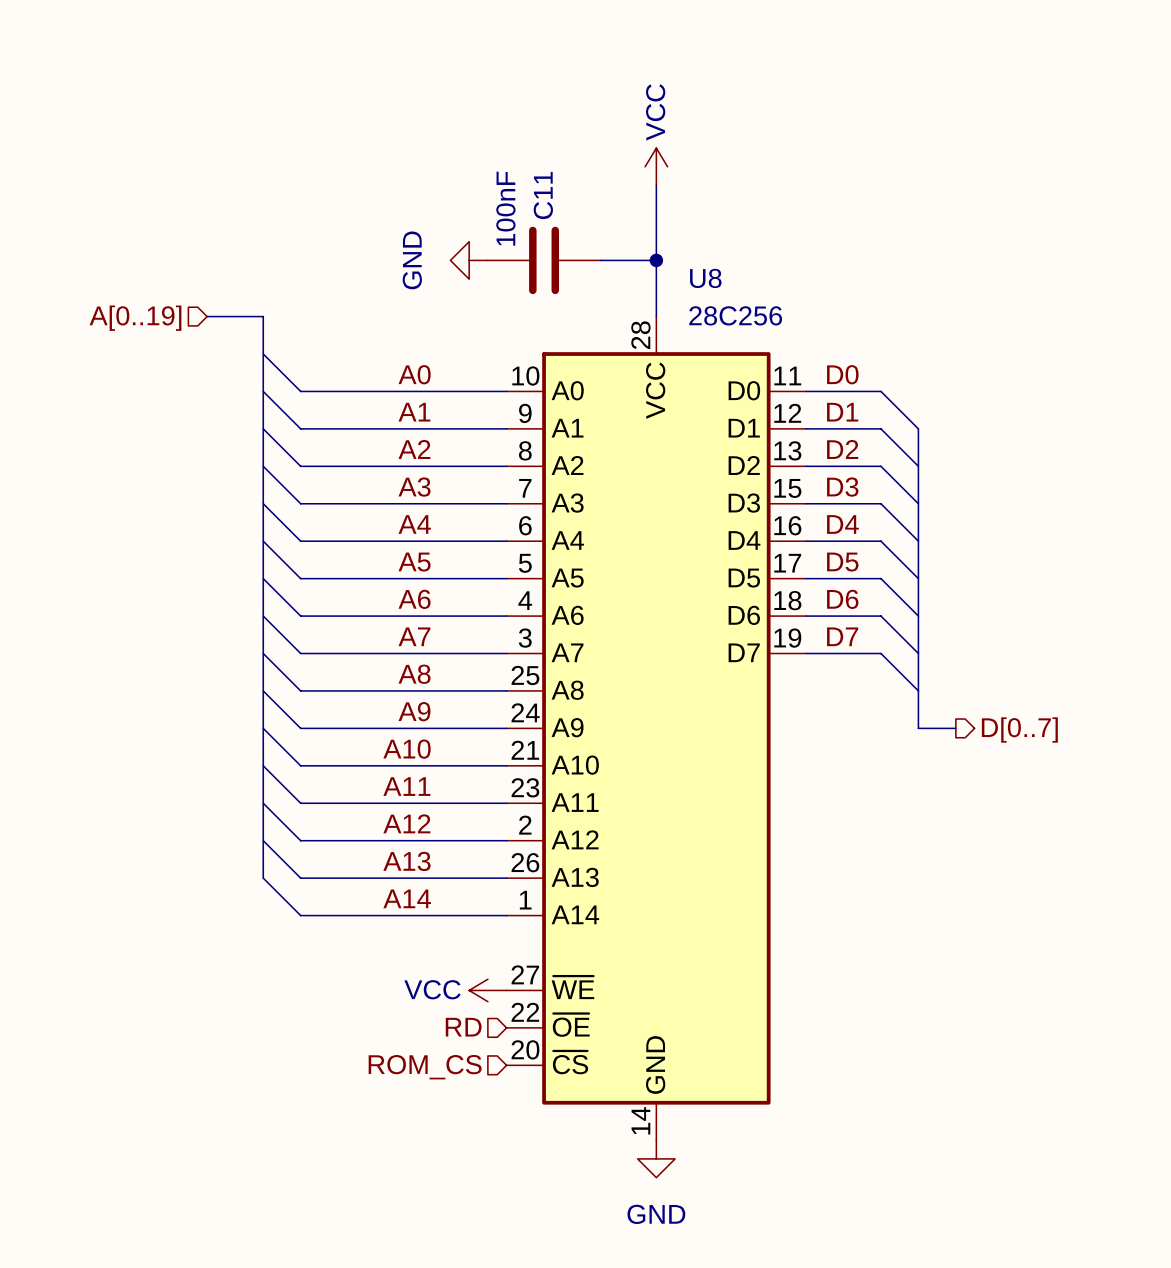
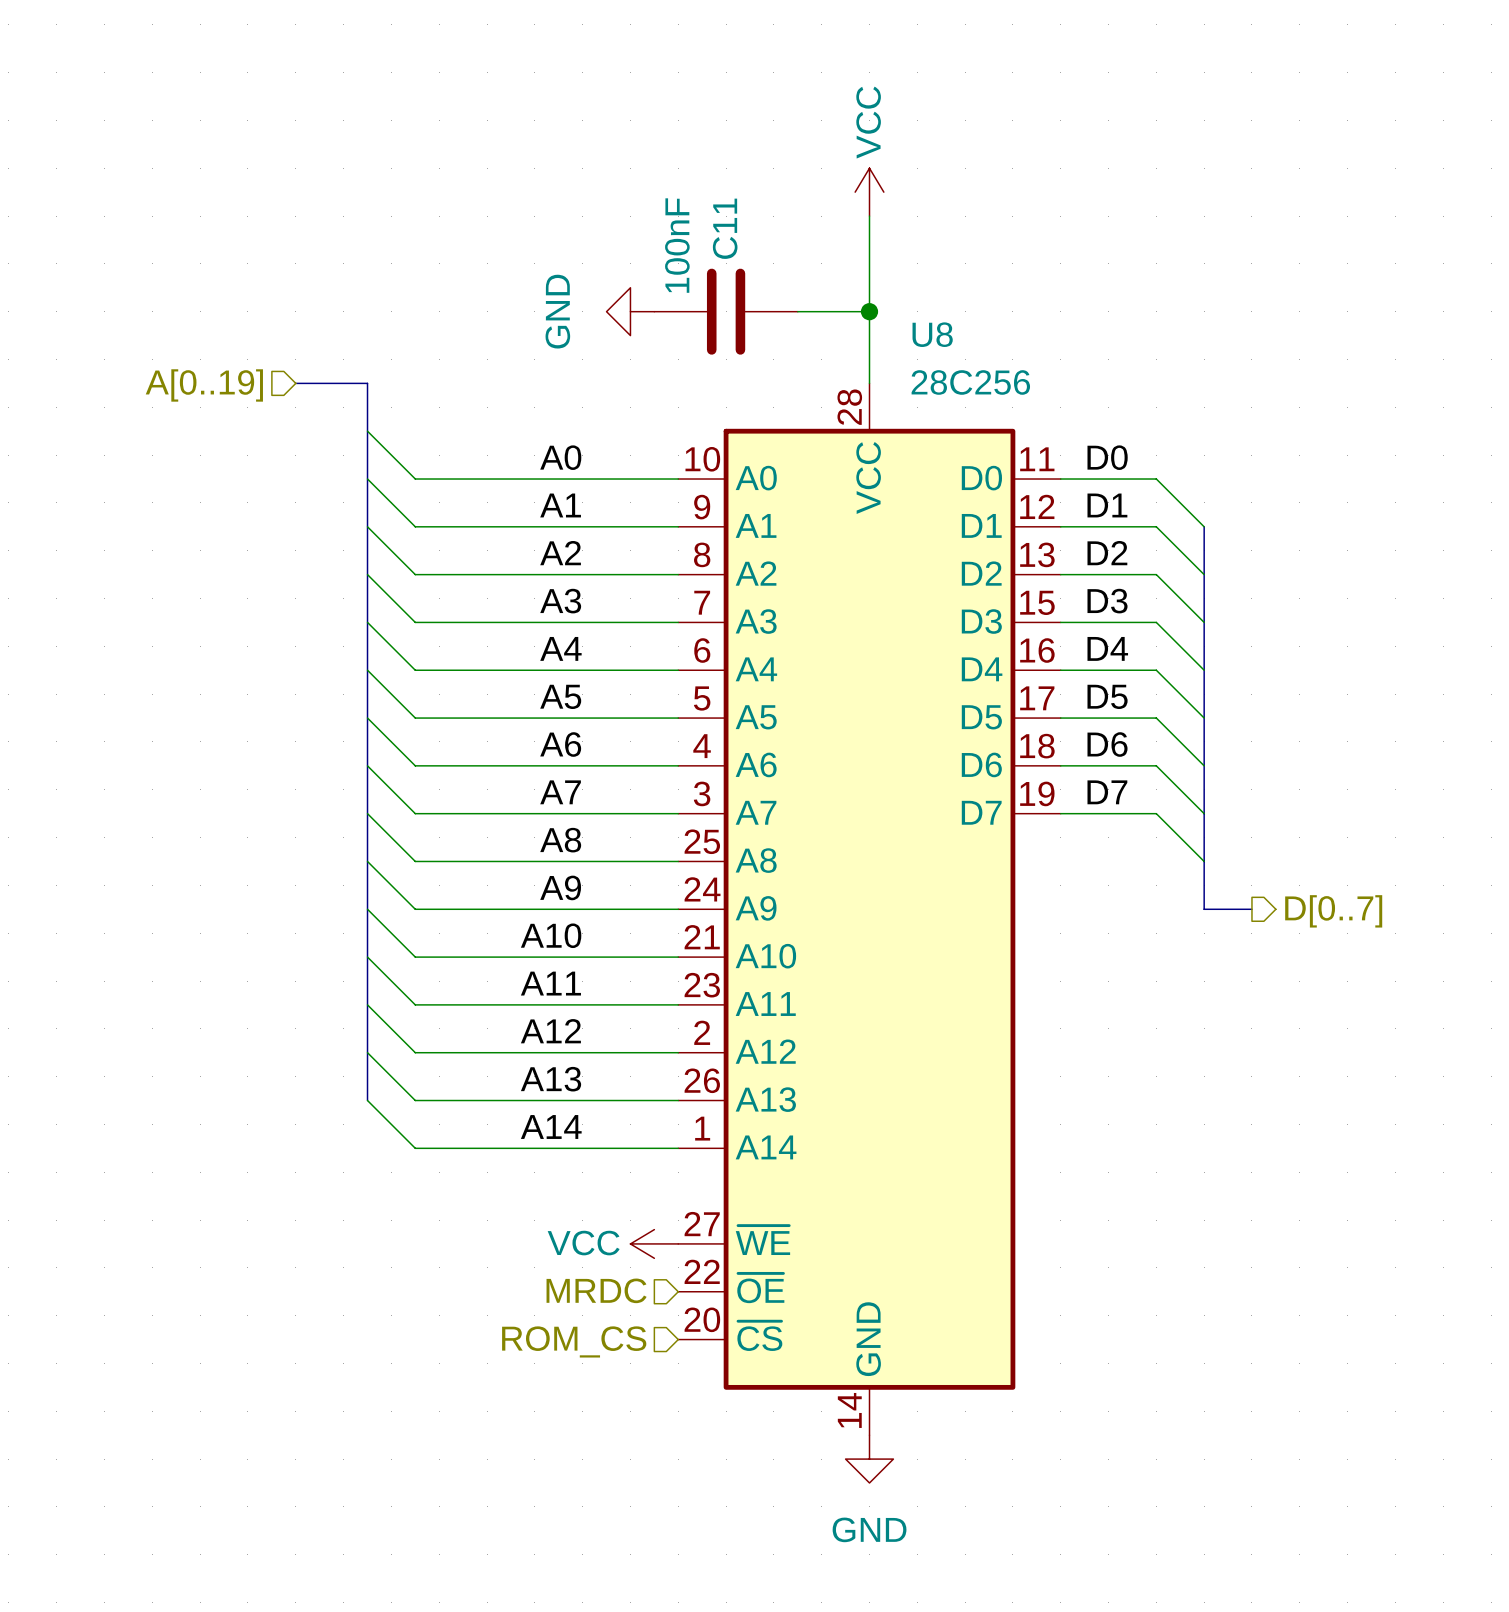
hierarchical label: RD (463, 1027) -> MRDC (596, 1290)

